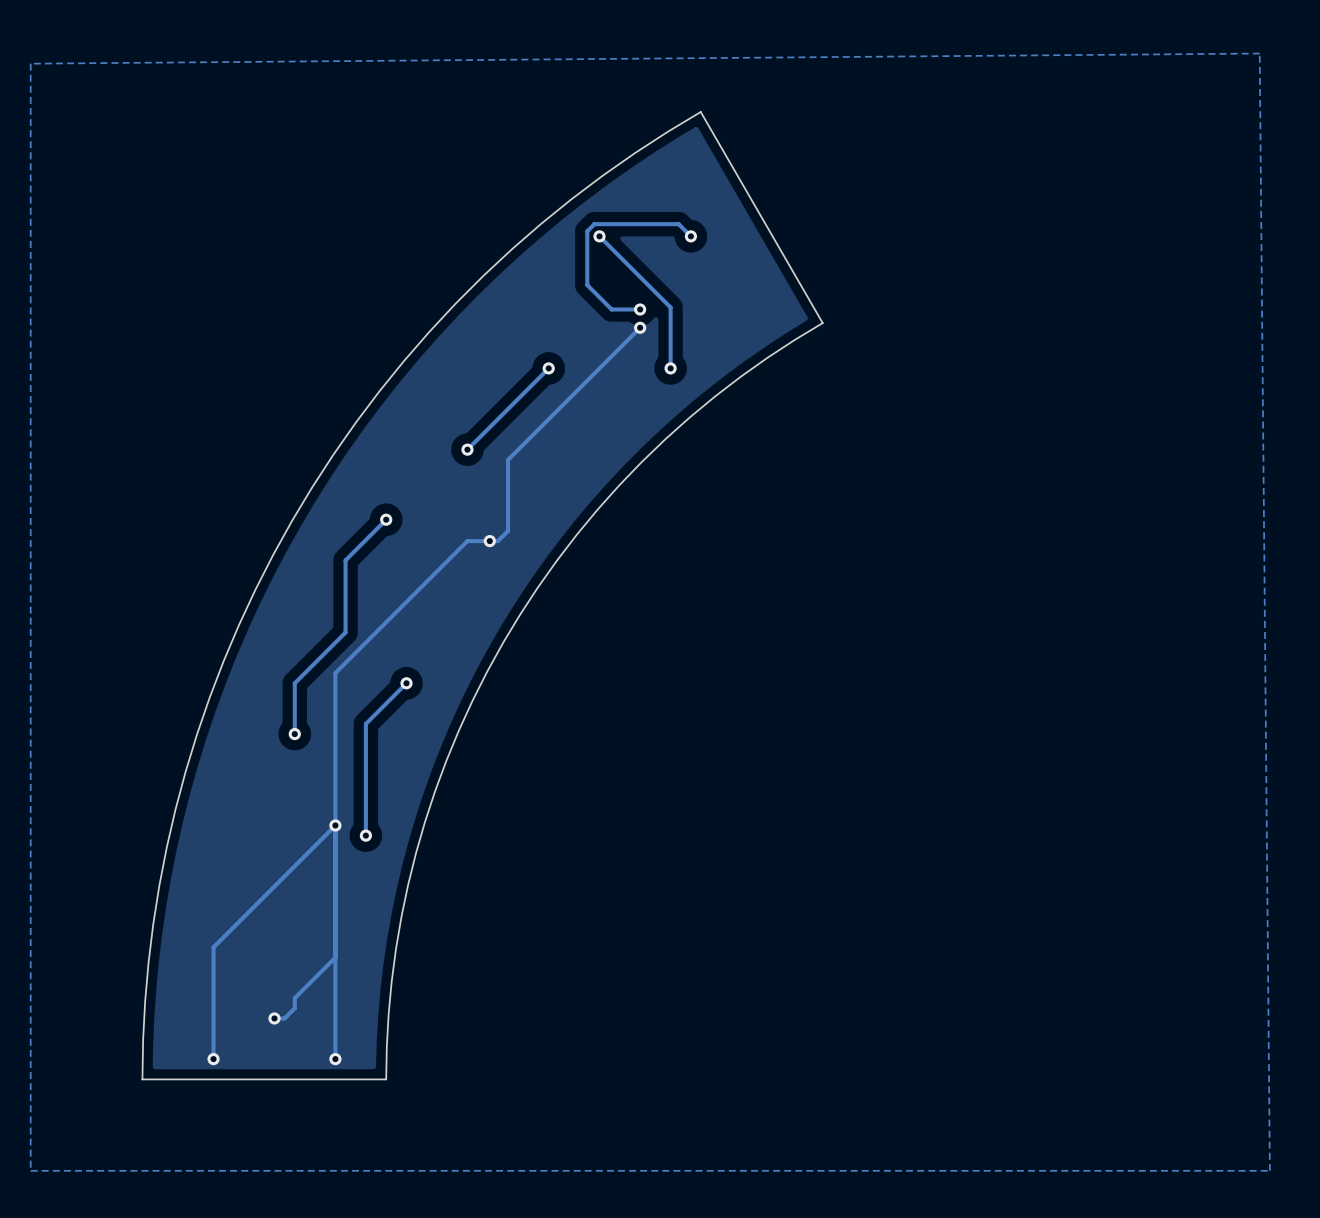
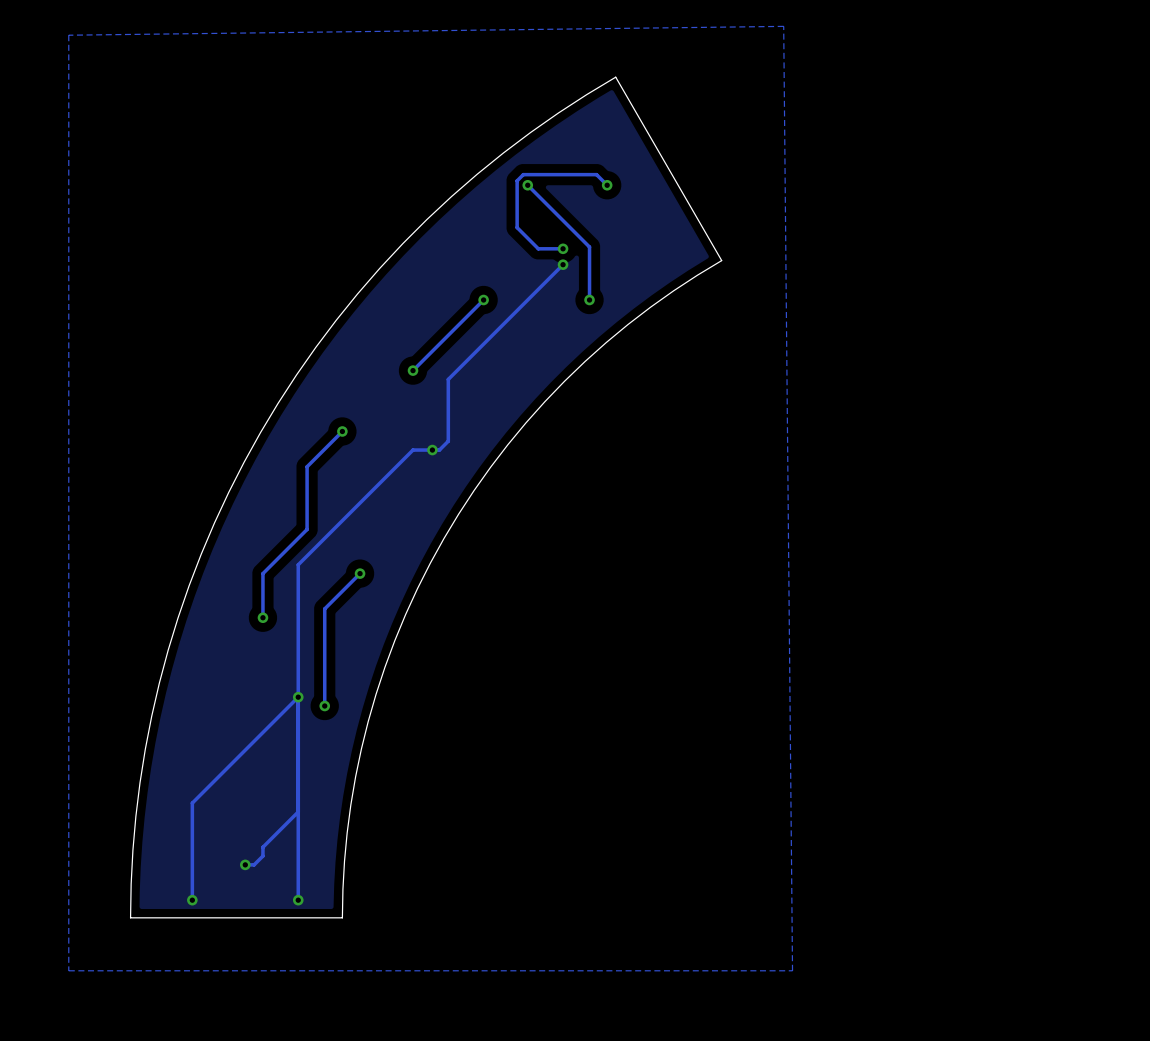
zone outline: (1259, 53) (30, 63) (30, 1170) (1269, 1170) (1259, 53) -> (783, 26) (792, 970) (68, 970) (68, 35) (783, 26)

